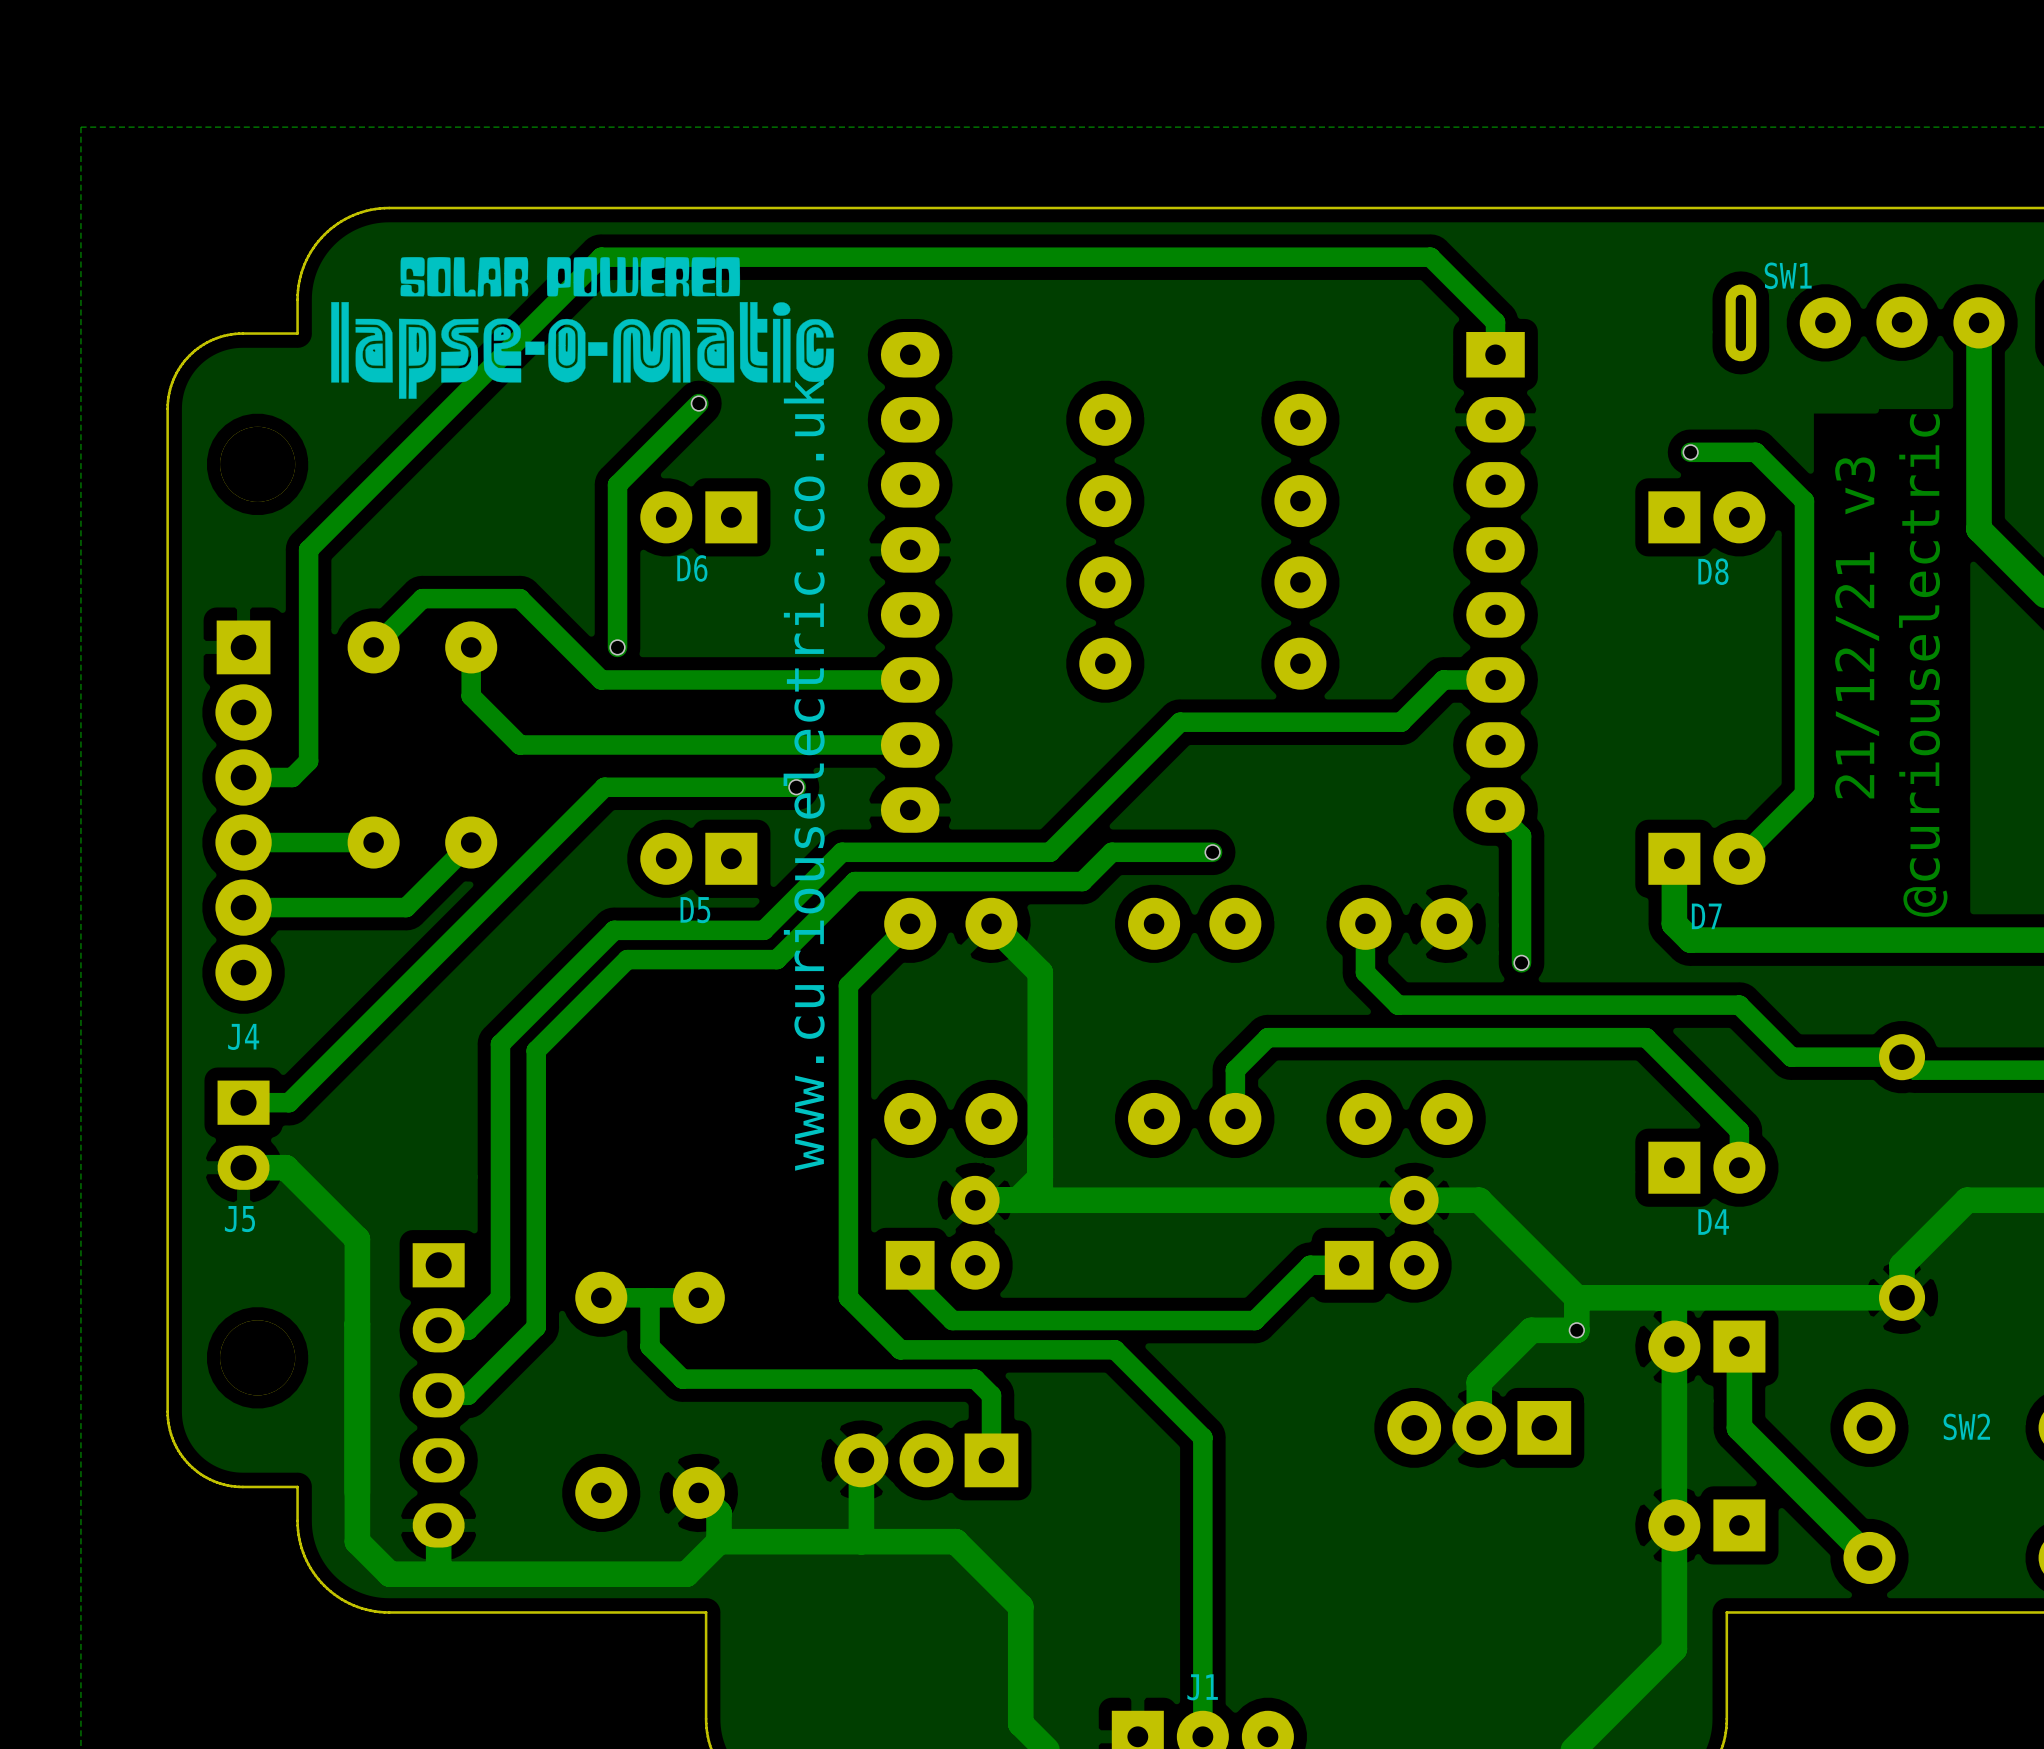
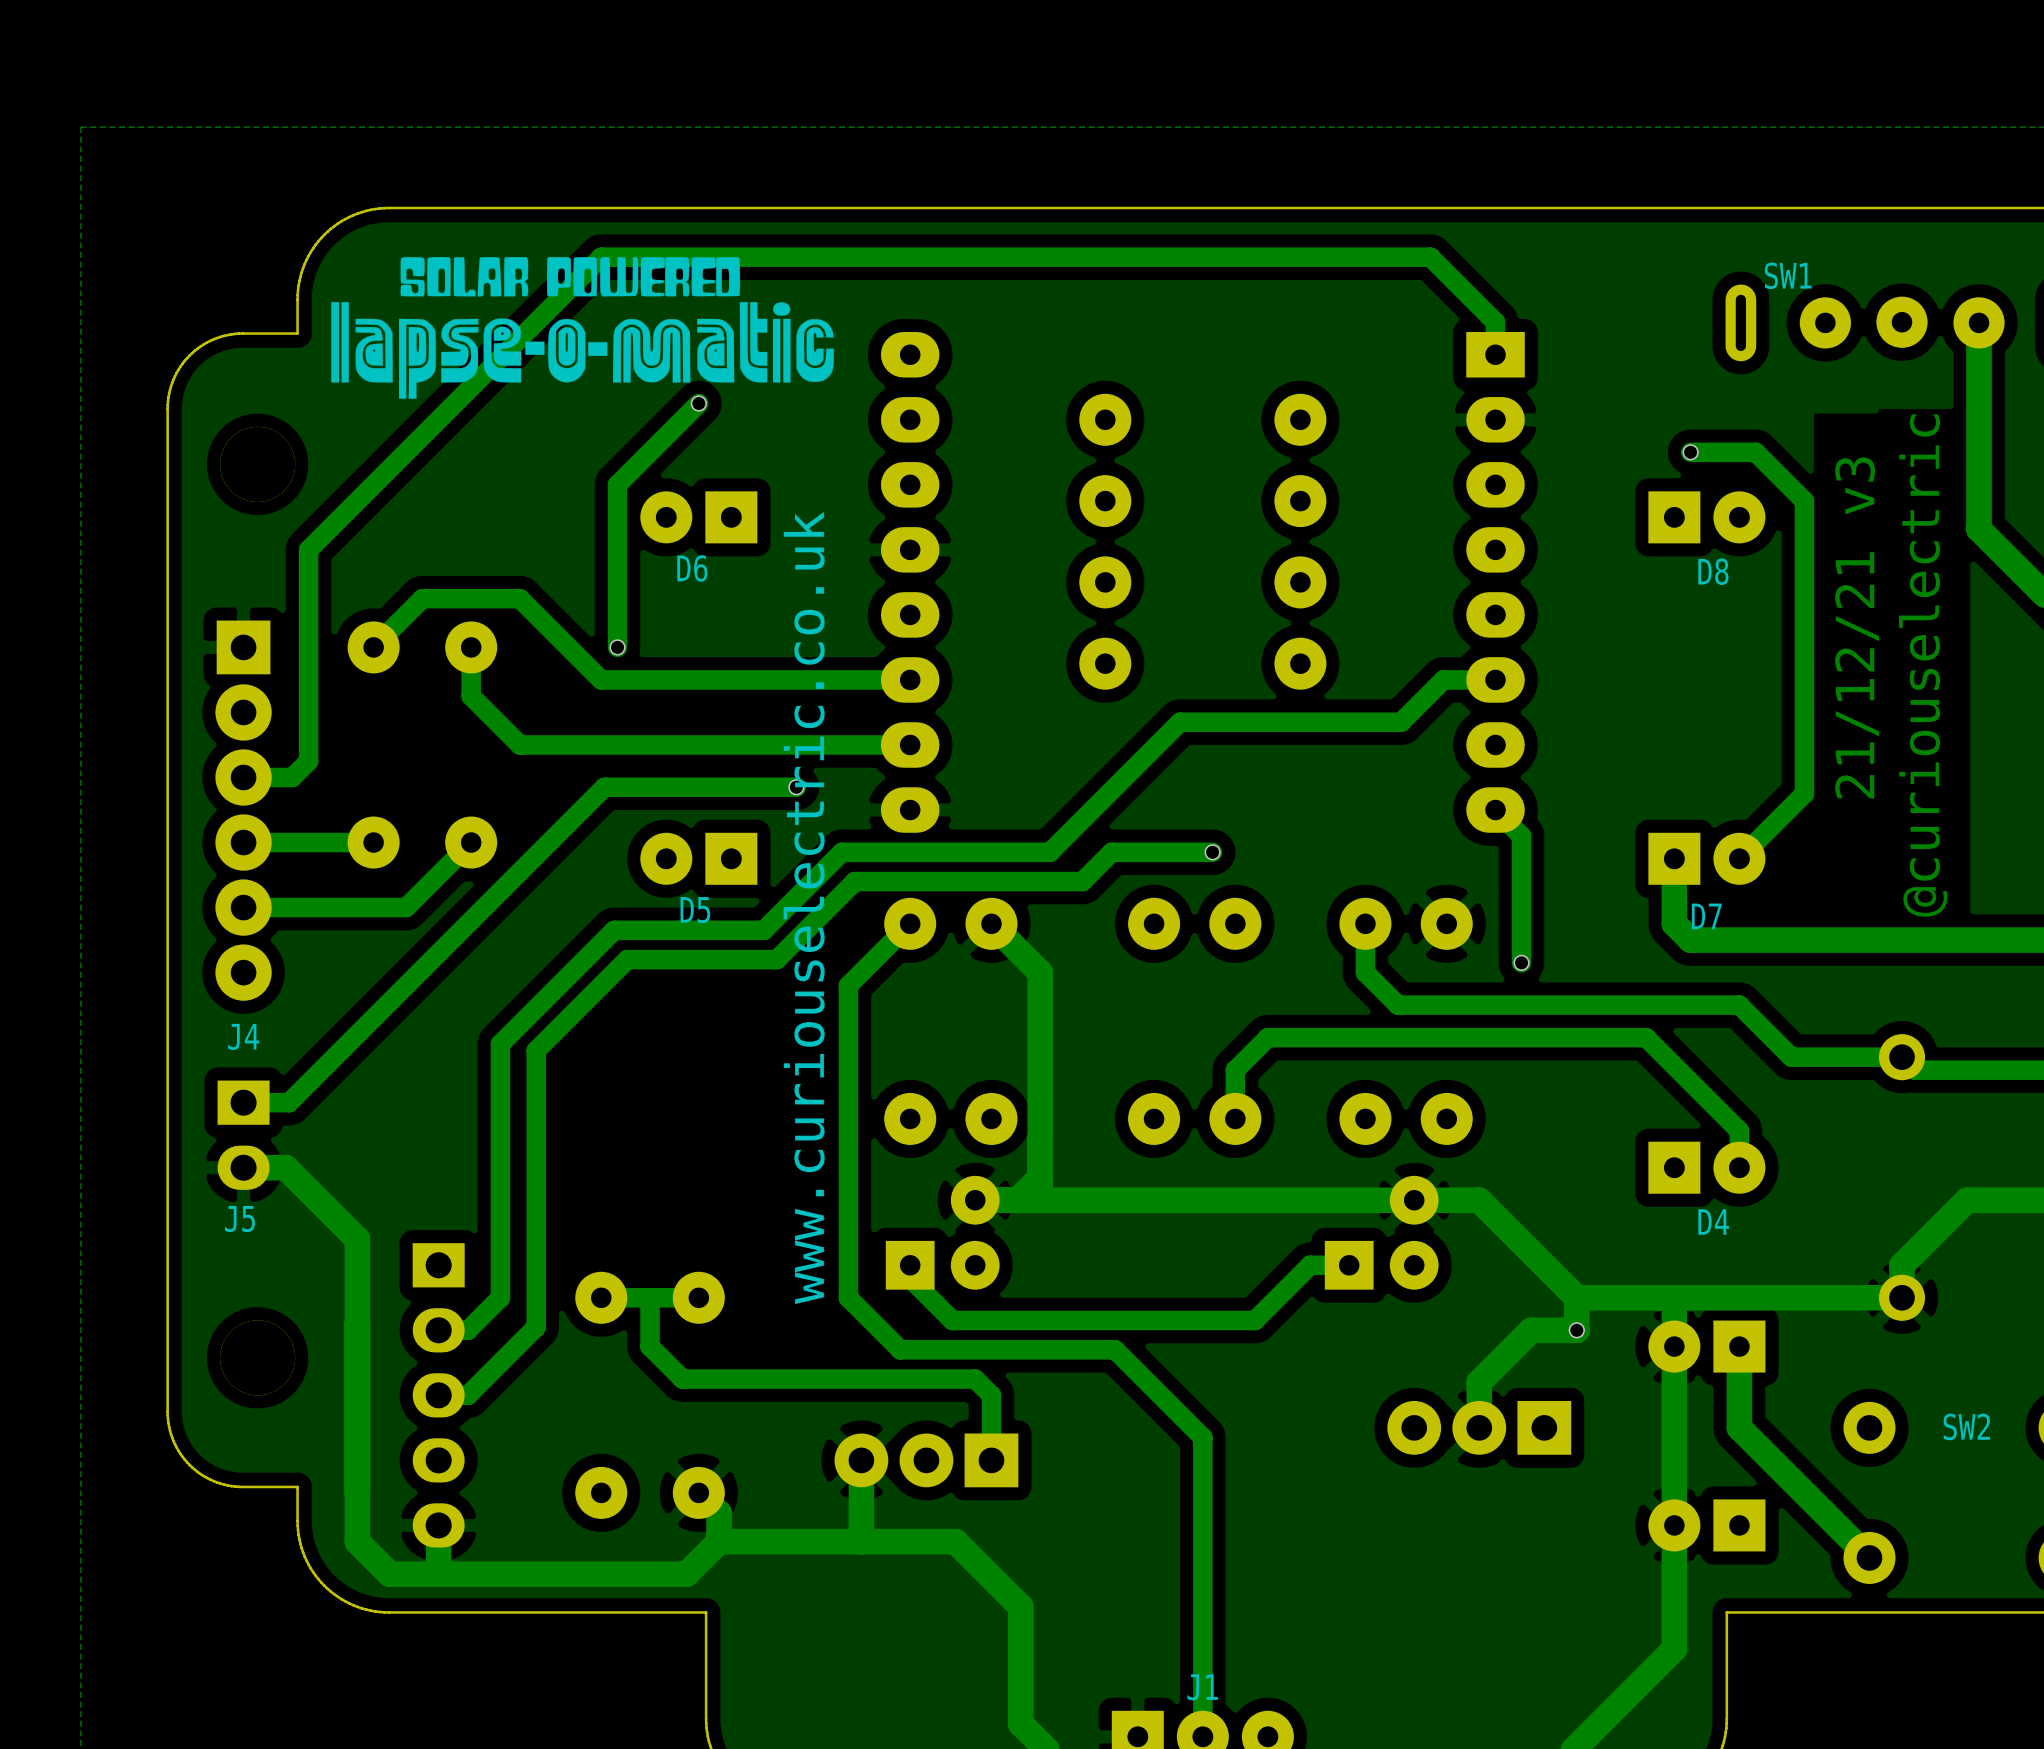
text position: www.curiouselectric.co.uk (804, 774) -> www.curiouselectric.co.uk (804, 907)

